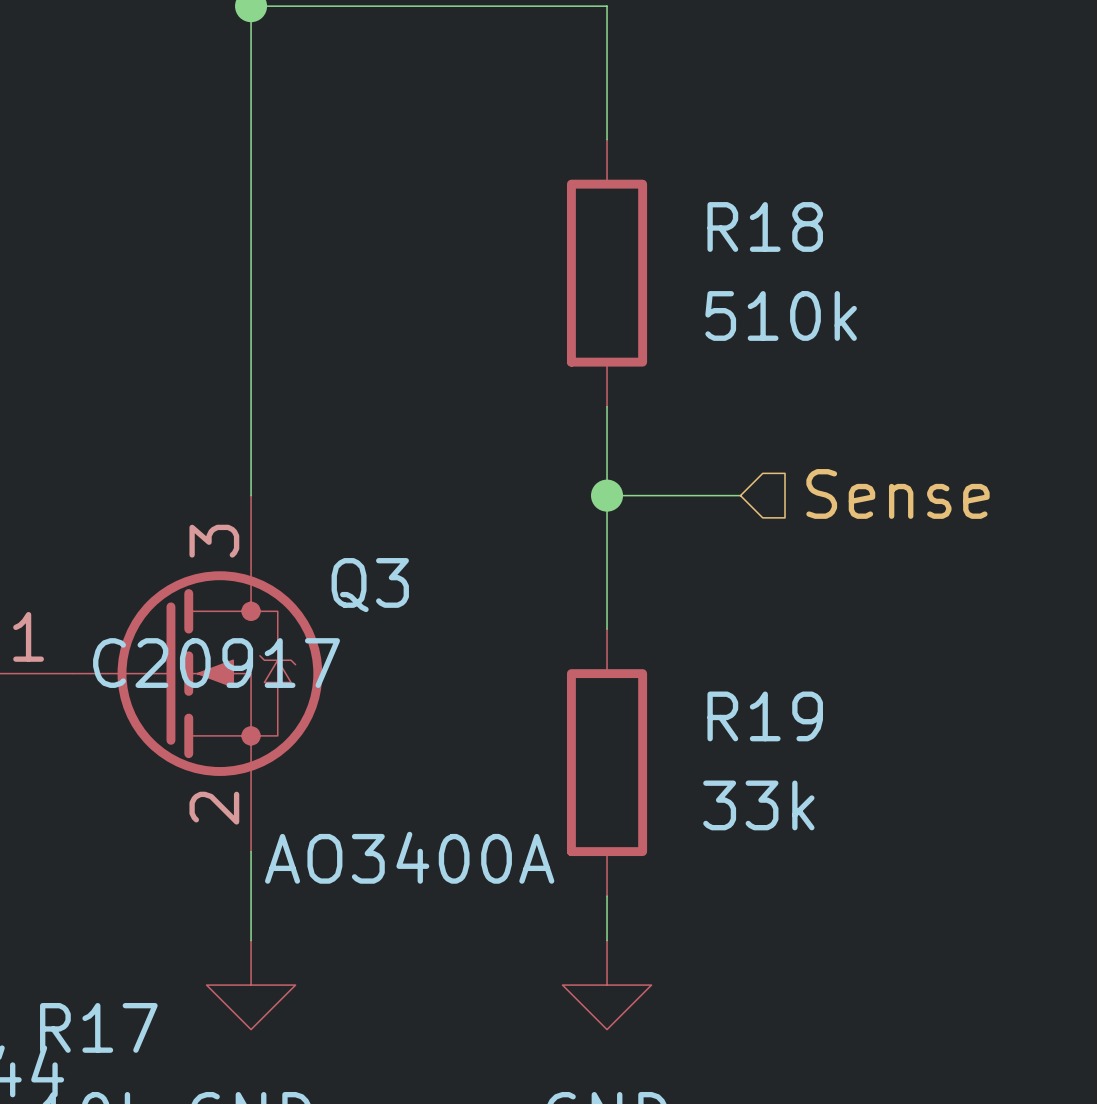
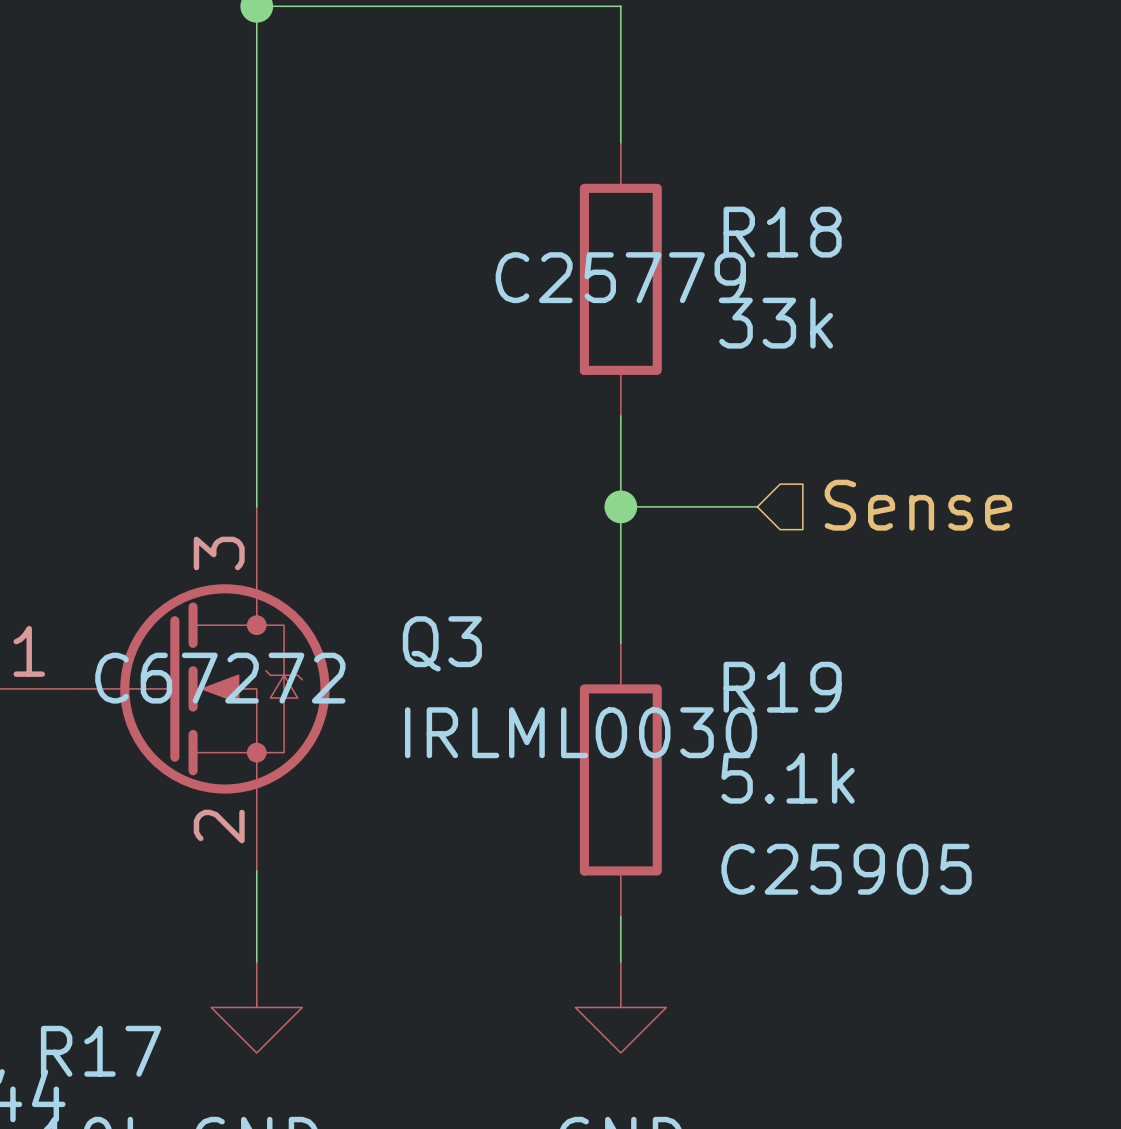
R18 text: none -> C25779 (620, 277)
R18 value: 510k (781, 315) -> 33k (776, 323)
Q3 name position: Q3 (370, 585) -> Q3 (442, 643)
Q3 text: C20917 (216, 663) -> C67272 (220, 678)
R19 name position: R19 (765, 716) -> R19 (782, 687)
R19 value: 33k (758, 805) -> 5.1k (788, 778)
R19 text: none -> C25905 (846, 869)
Q3 value: AO3400A (409, 857) -> IRLML0030 (581, 732)

